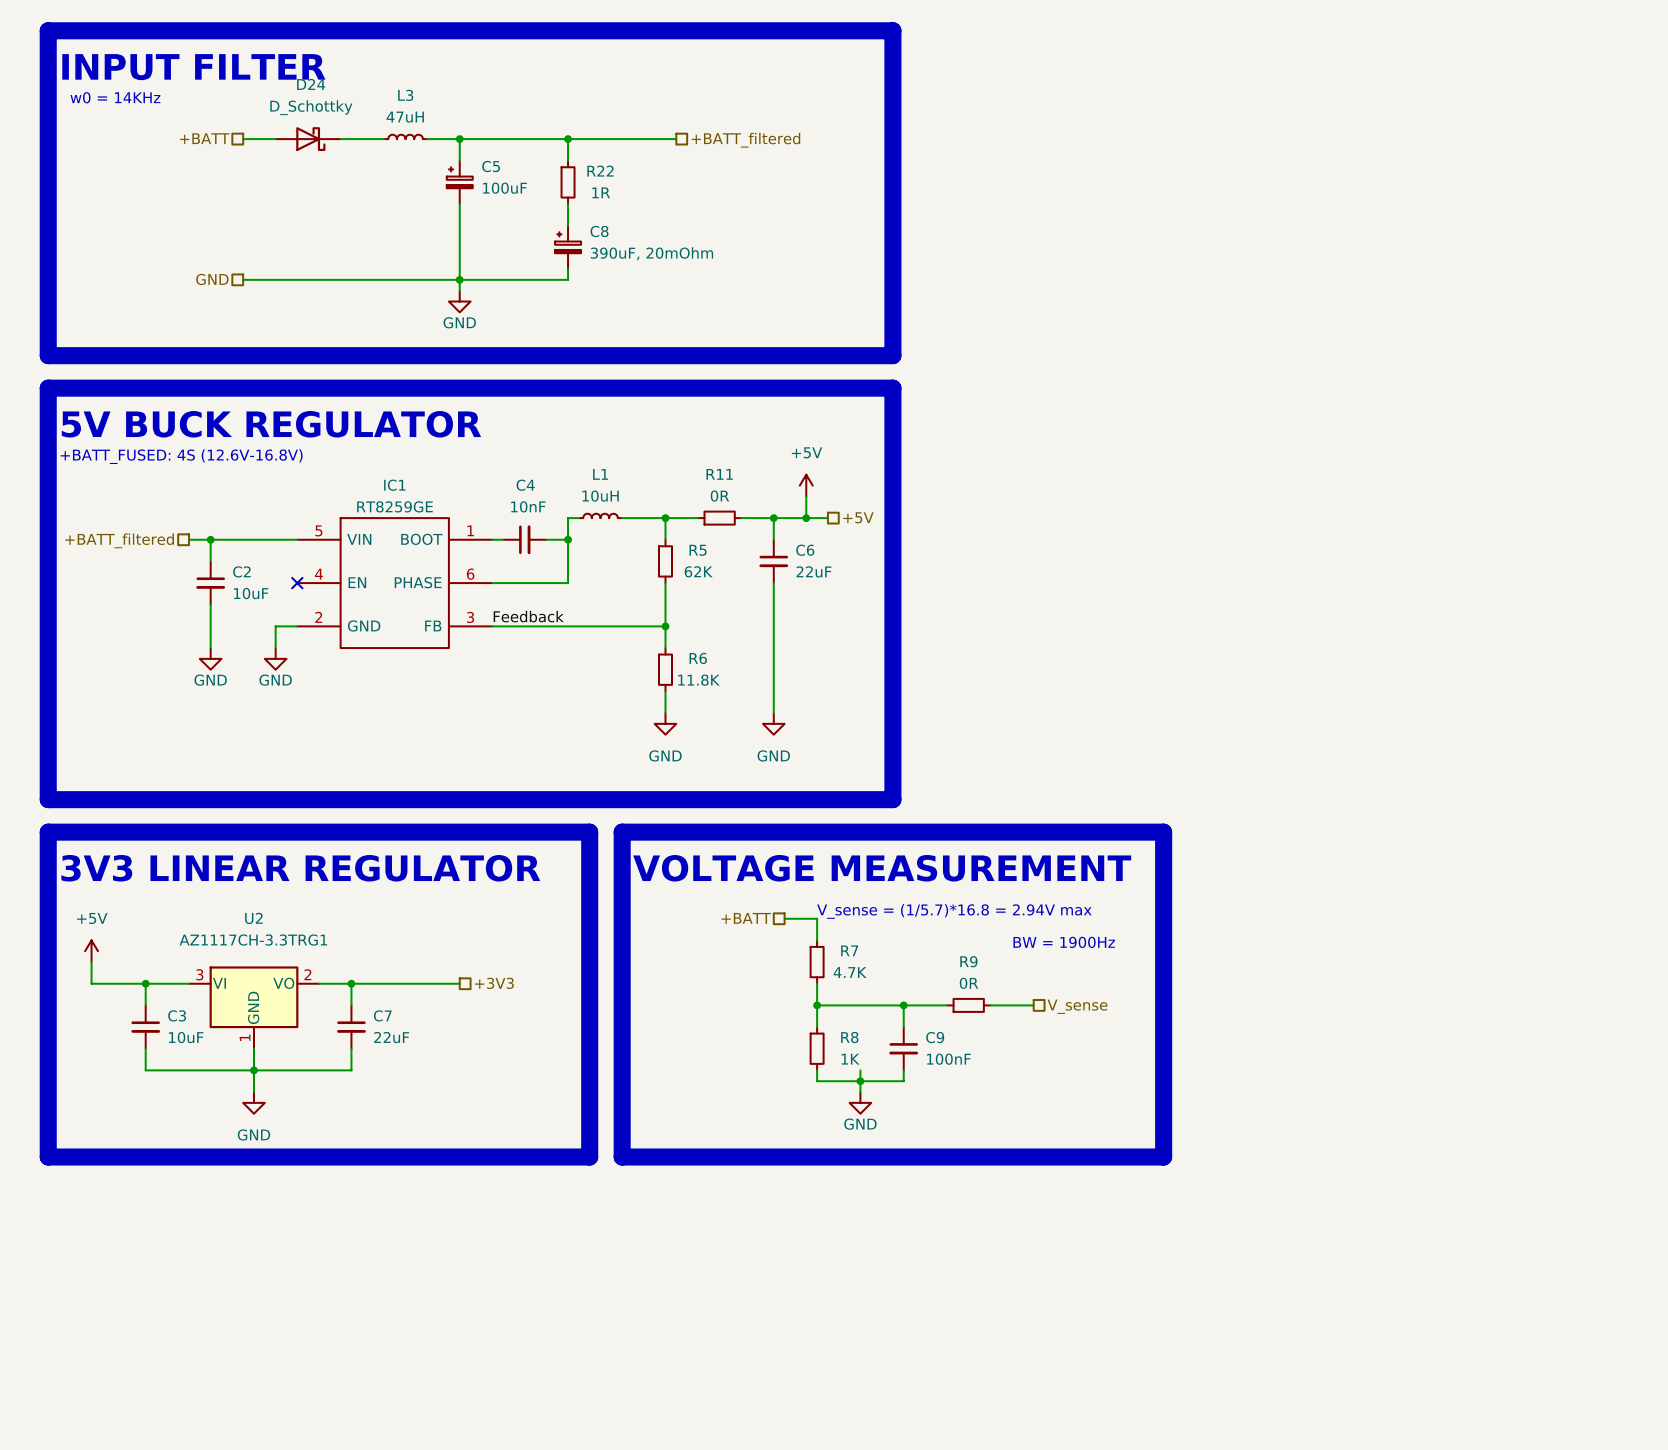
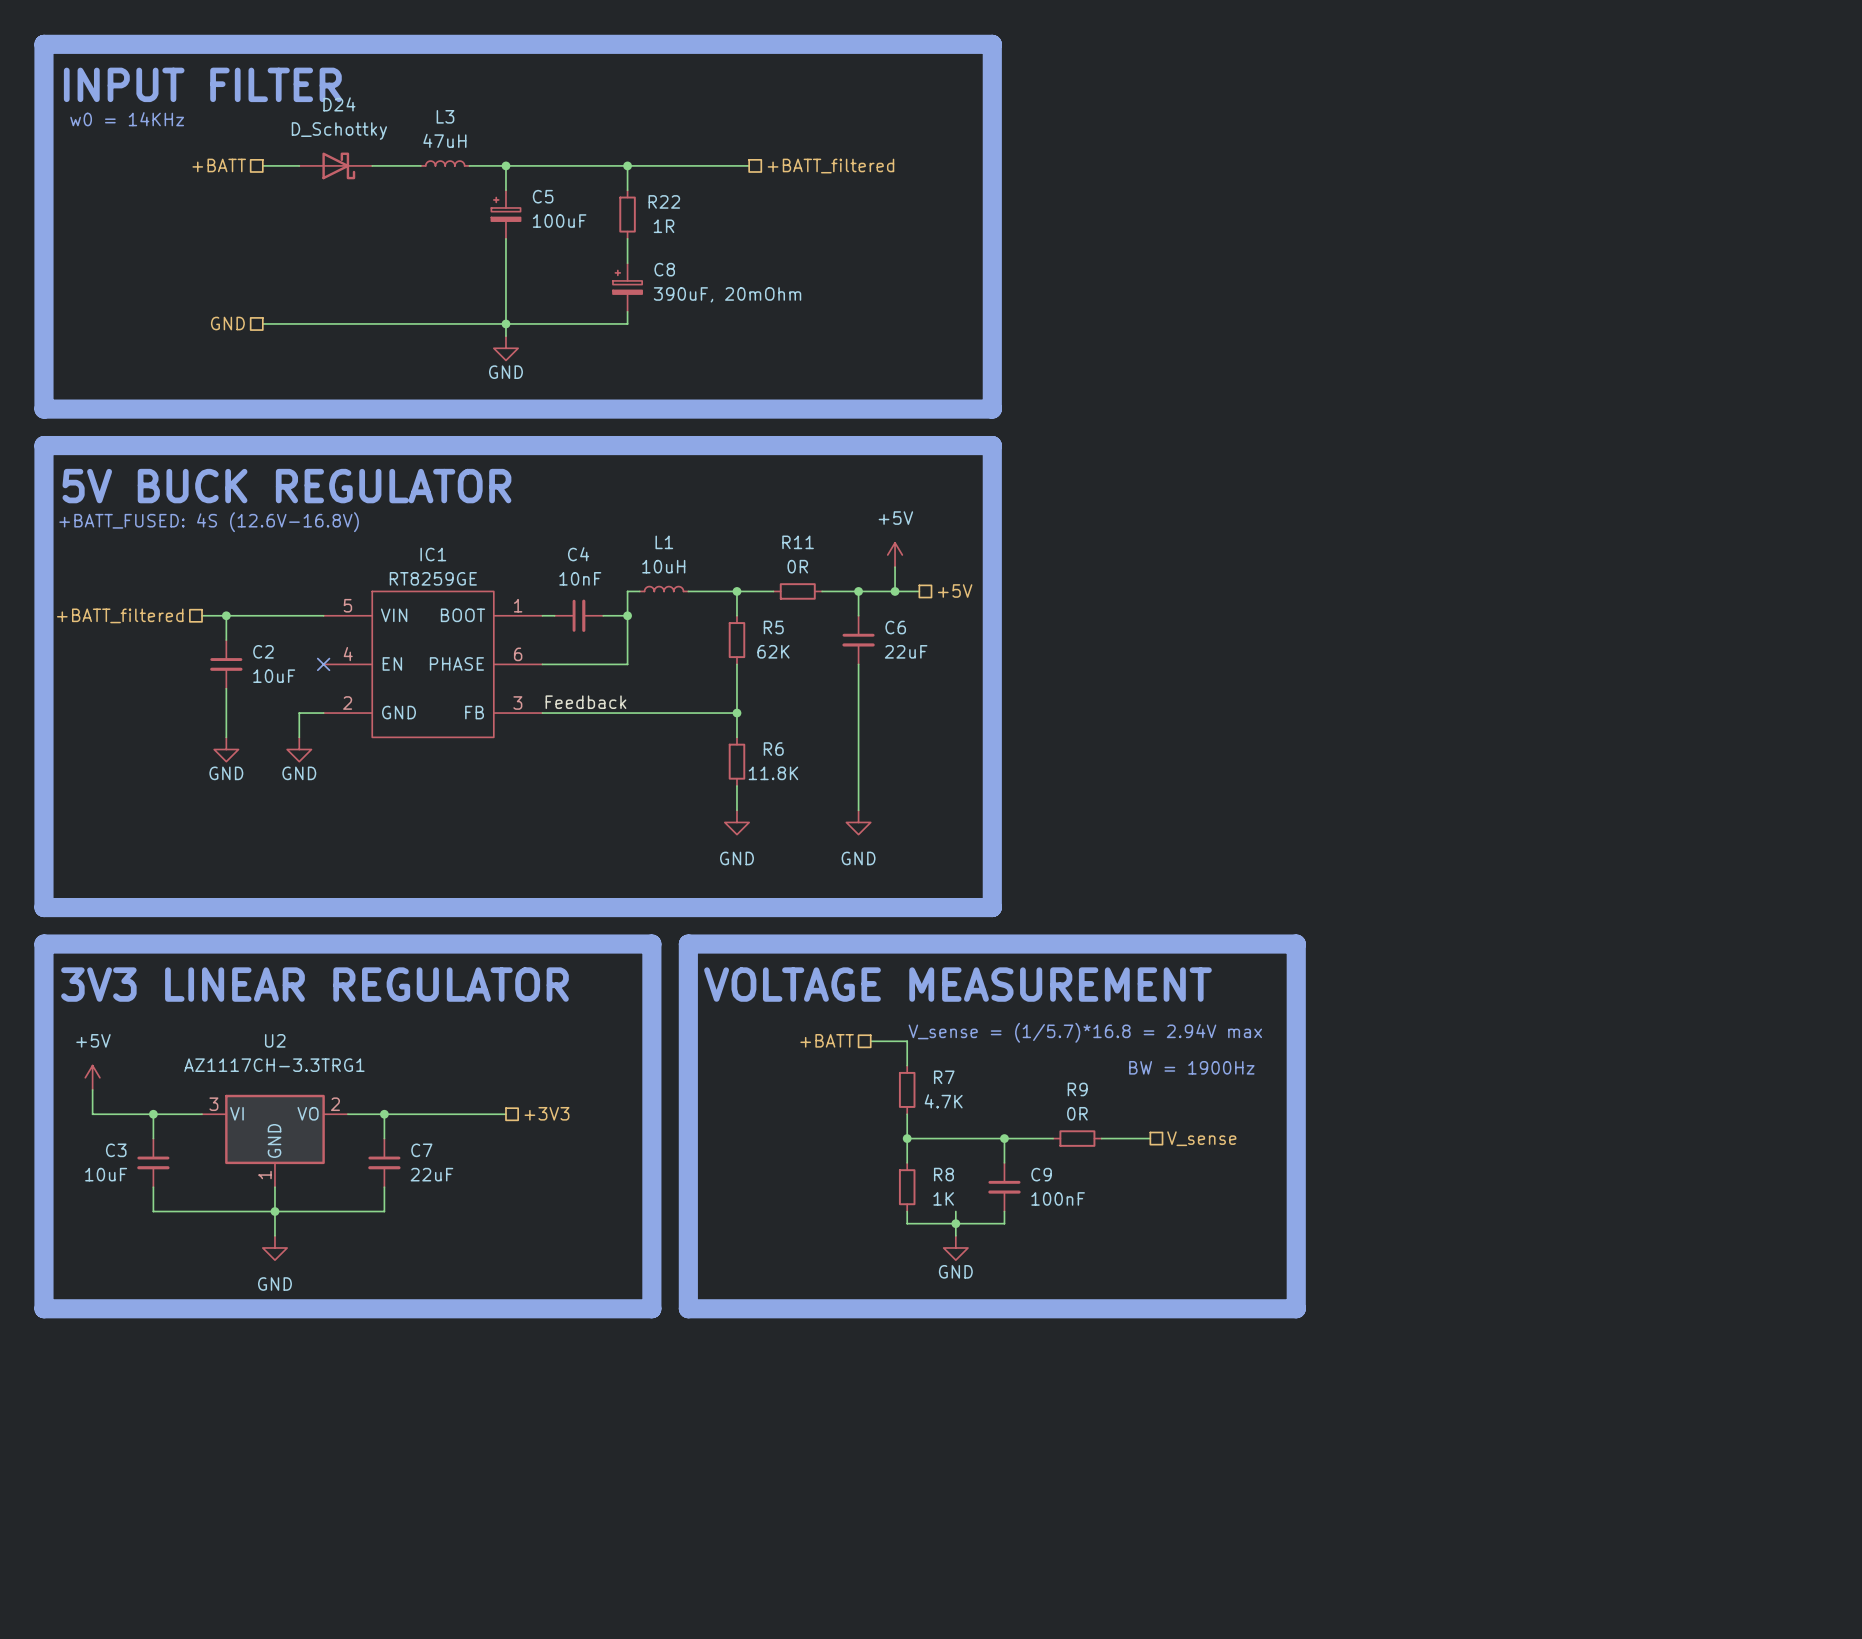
C3 name position: C3 (177, 1015) -> C3 (116, 1150)
C3 value position: 10uF (186, 1037) -> 10uF (106, 1174)

